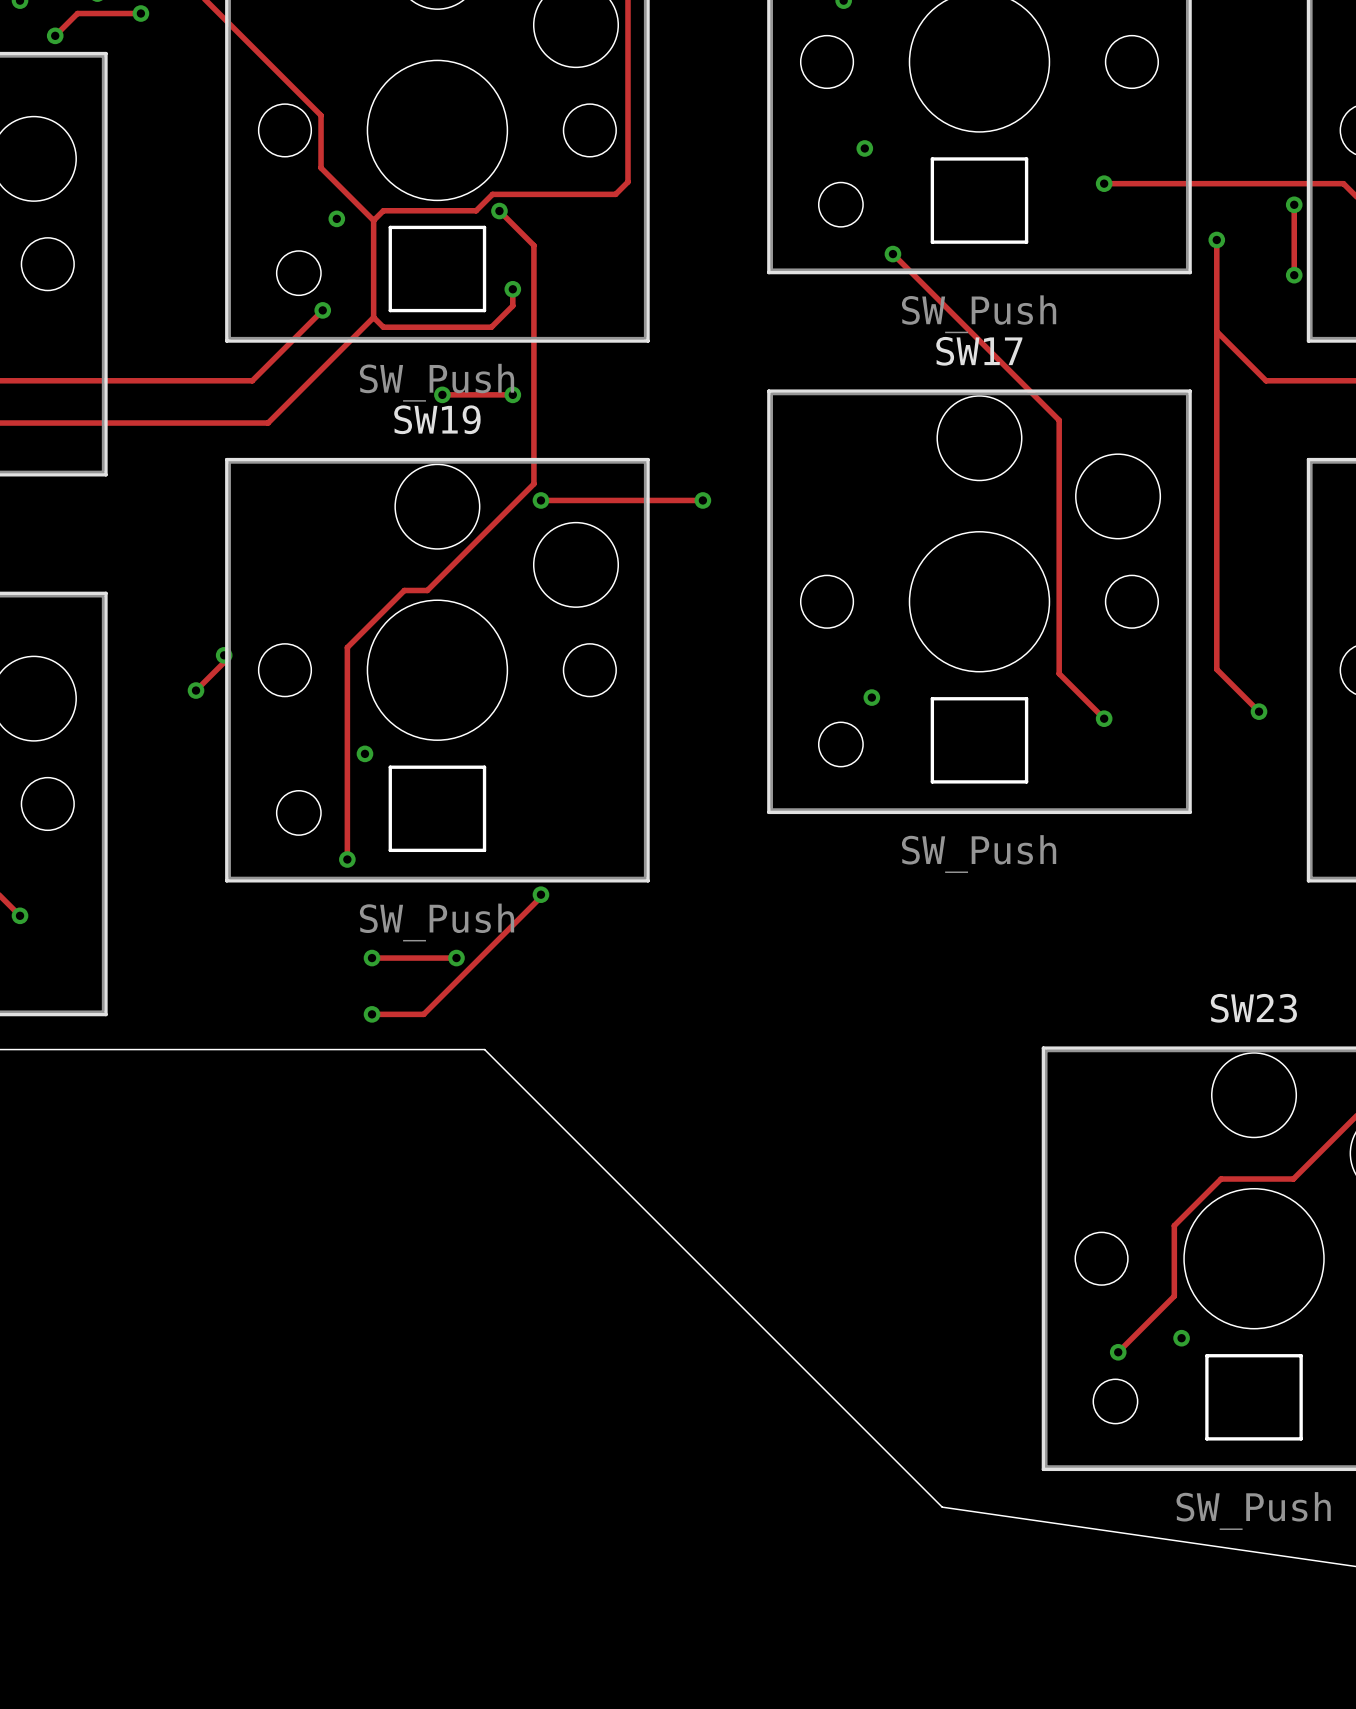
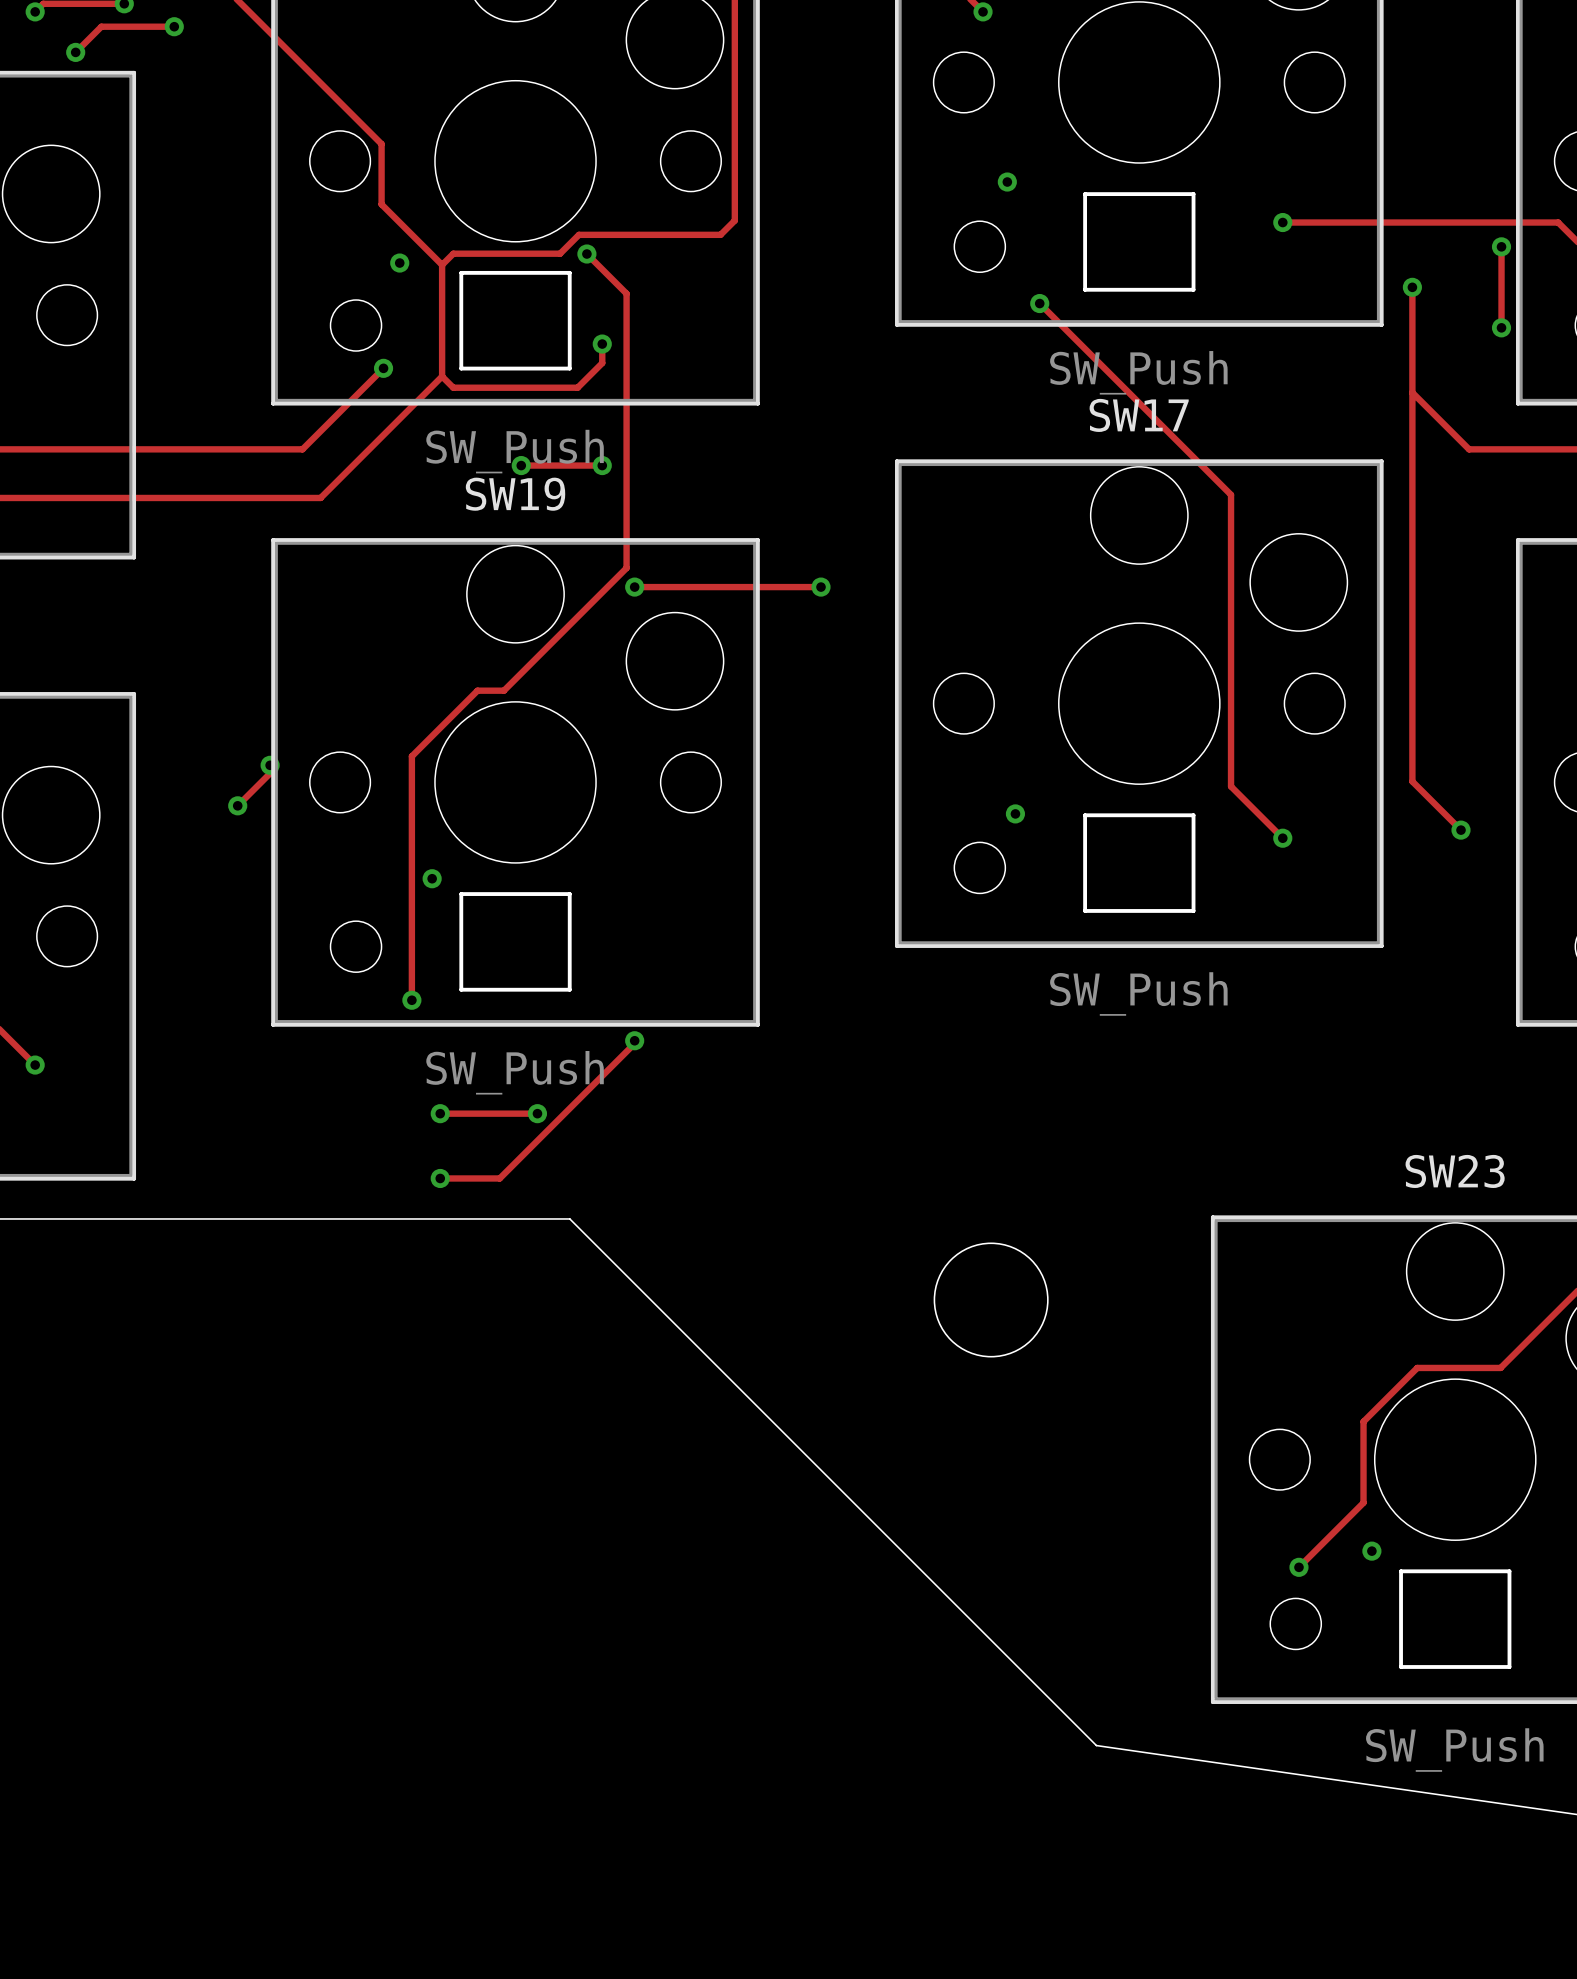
round board edge: none -> [933, 1242, 1049, 1358]

